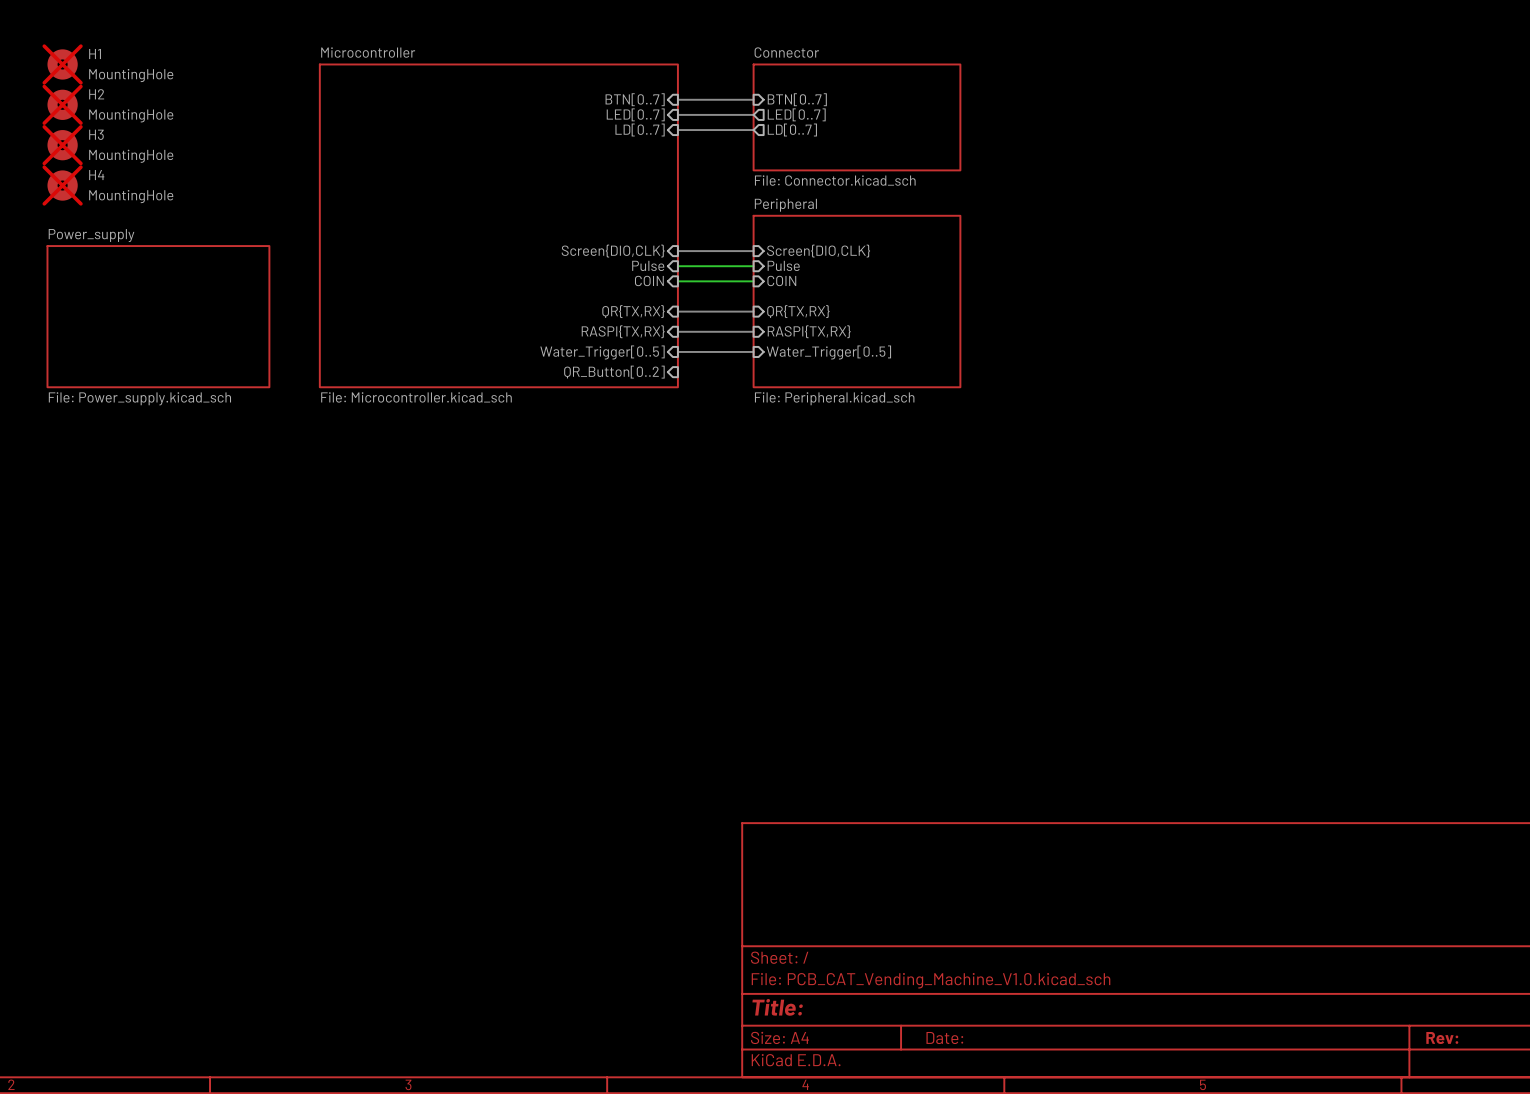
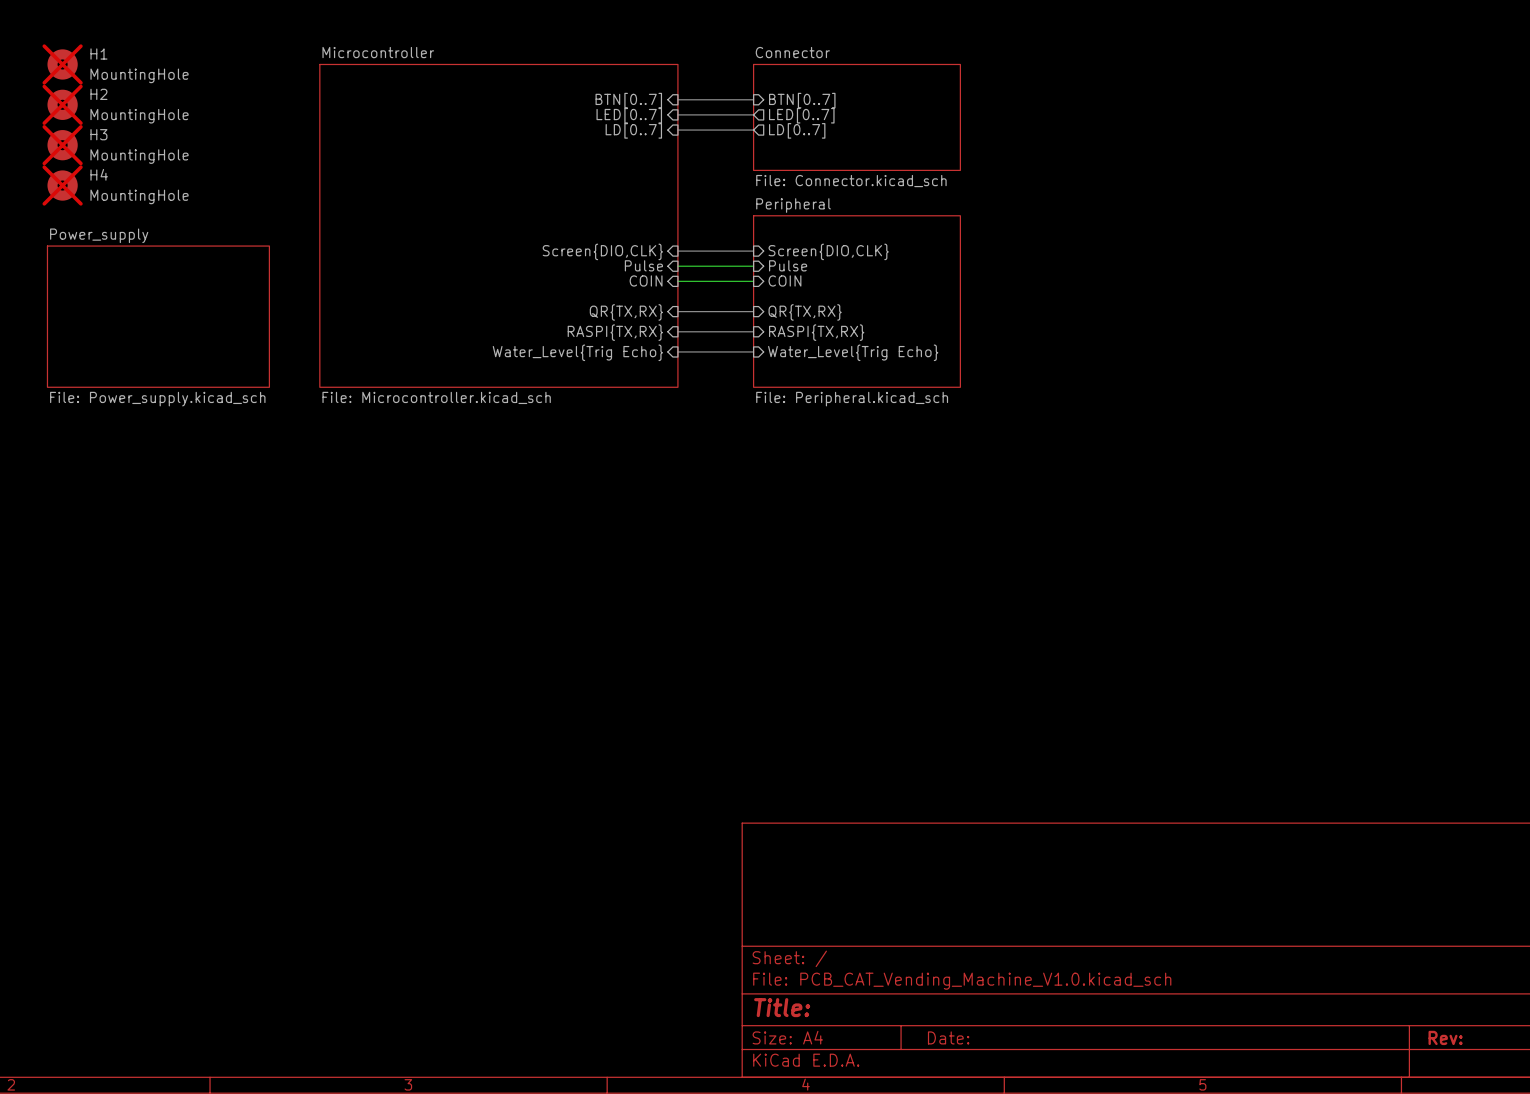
sheet pin: Water_Trigger[0..5] (602, 352) -> Water_Level{Trig Echo} (577, 352)
sheet pin: Water_Trigger[0..5] (828, 352) -> Water_Level{Trig Echo} (853, 352)
sheet pin: QR_Button[0..2] (614, 372) -> none

